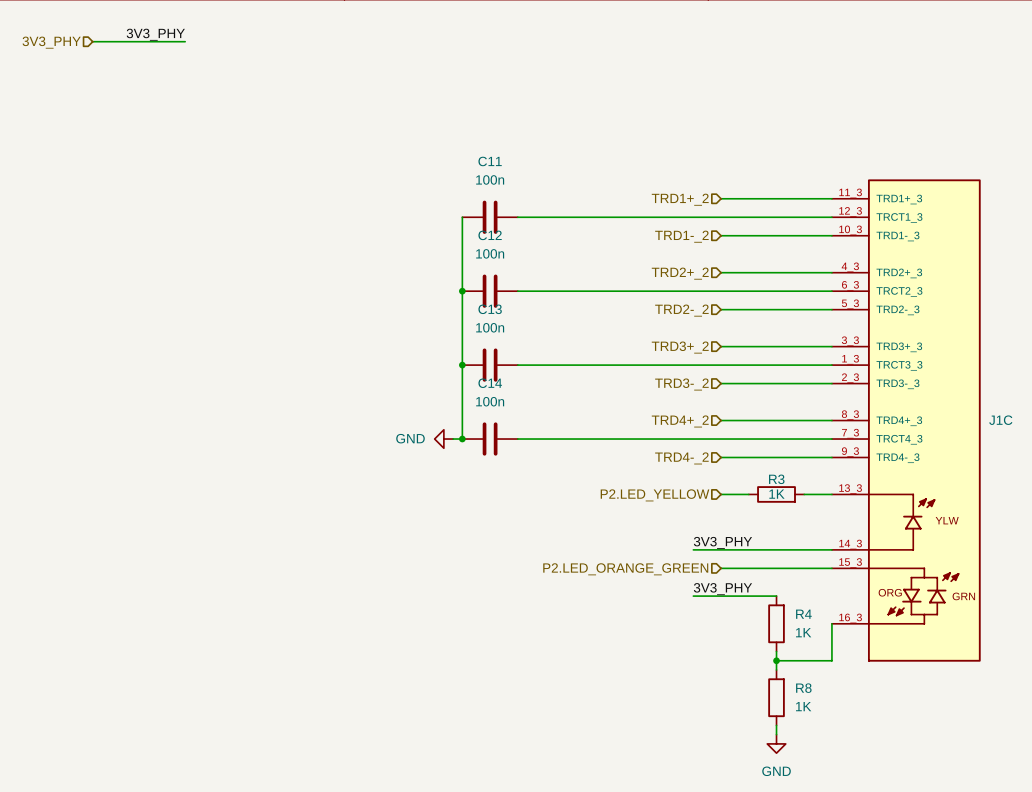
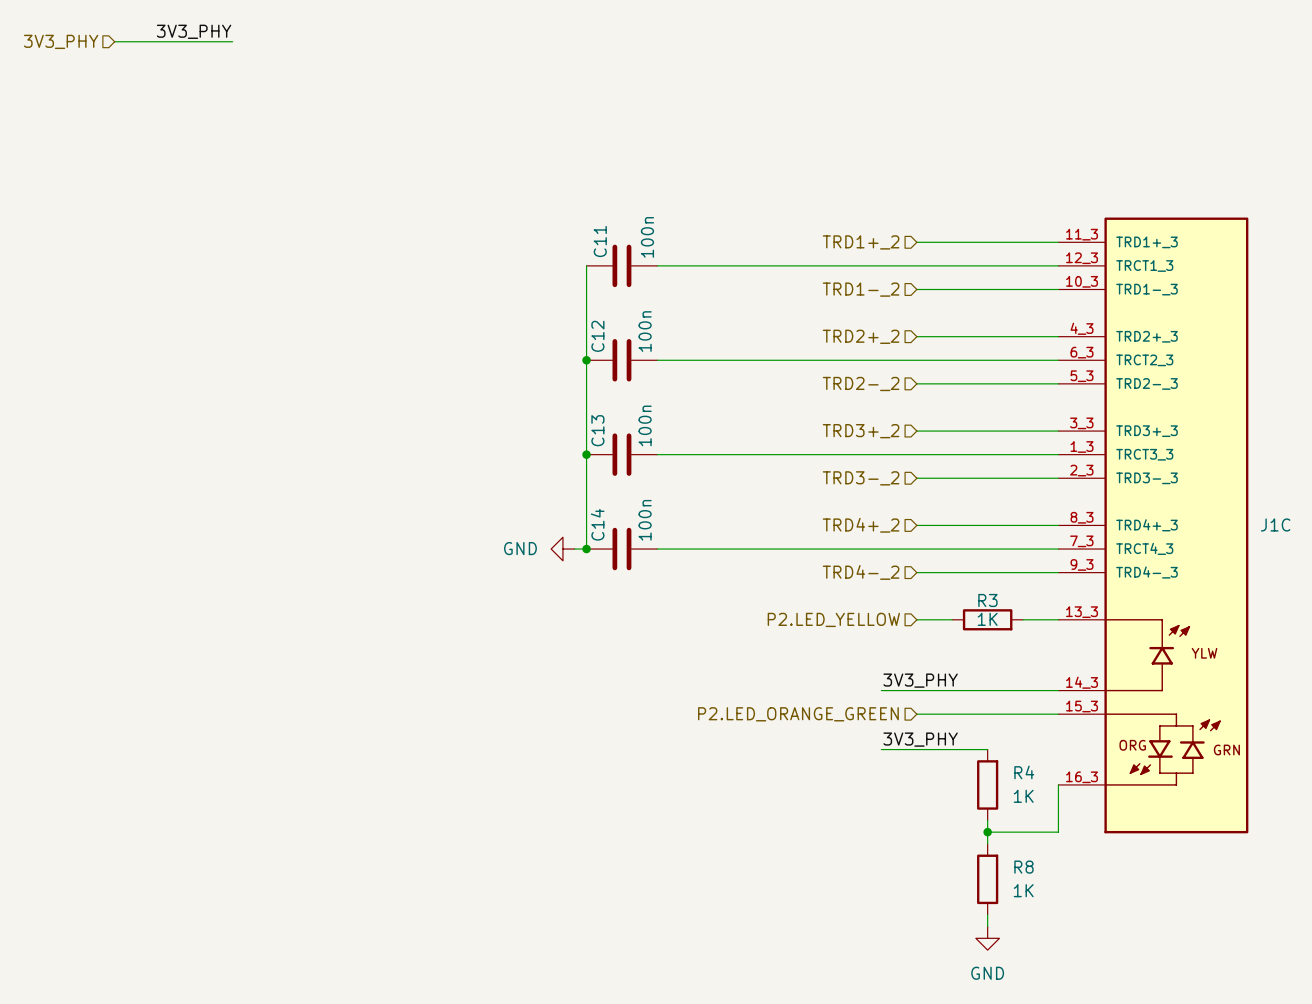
C11 name rotation: 0° (490, 161) -> 90° counterclockwise (600, 241)
C11 name position: C11 (490, 161) -> C11 (600, 241)
C11 value rotation: 0° (490, 179) -> 90° counterclockwise (647, 237)
C12 name rotation: 0° (490, 235) -> 90° counterclockwise (597, 336)
C12 name position: C12 (490, 235) -> C12 (597, 336)
C12 value rotation: 0° (490, 253) -> 90° counterclockwise (645, 331)
C13 name rotation: 0° (490, 309) -> 90° counterclockwise (597, 430)
C13 name position: C13 (490, 309) -> C13 (597, 430)
C13 value rotation: 0° (490, 327) -> 90° counterclockwise (645, 425)
C14 name rotation: 0° (490, 383) -> 90° counterclockwise (597, 524)
C14 name position: C14 (490, 383) -> C14 (597, 524)
C14 value rotation: 0° (490, 401) -> 90° counterclockwise (645, 520)

